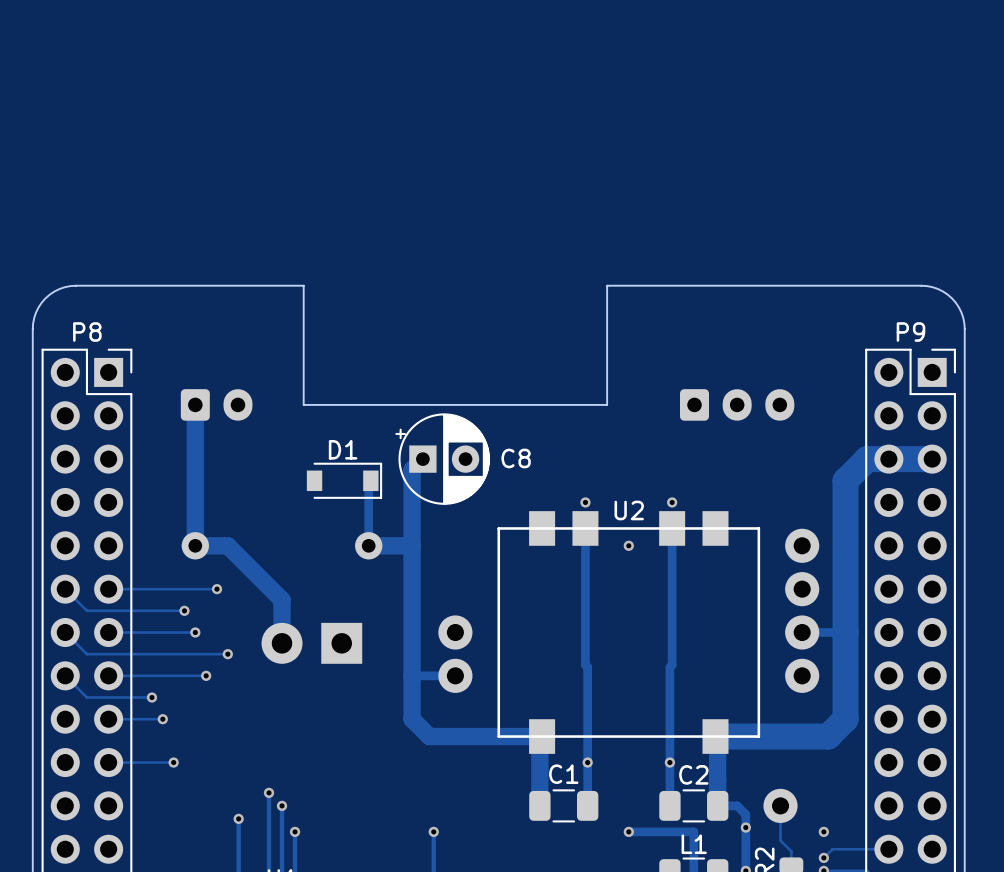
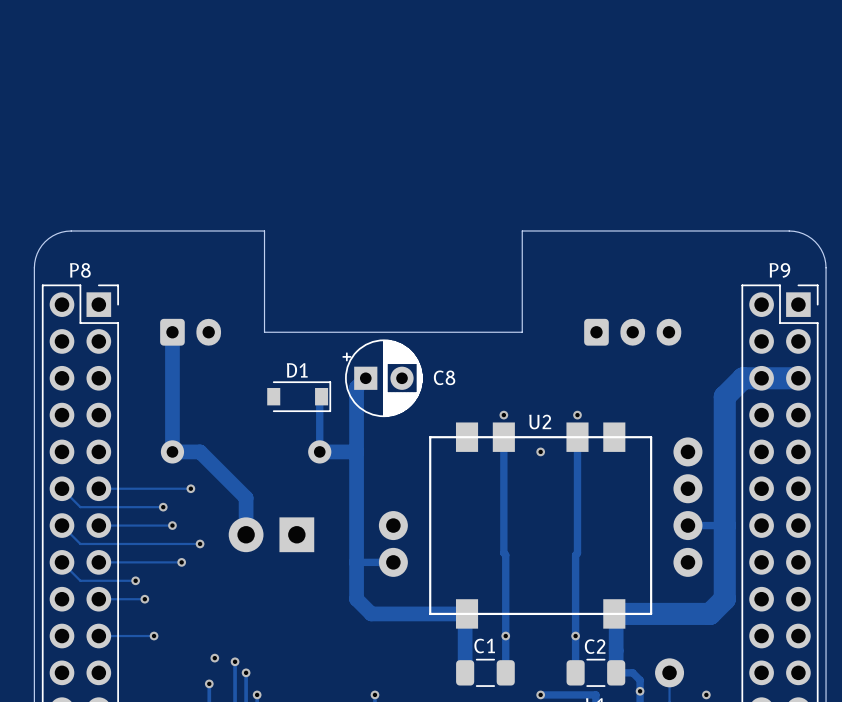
via: none -> (214, 658)

